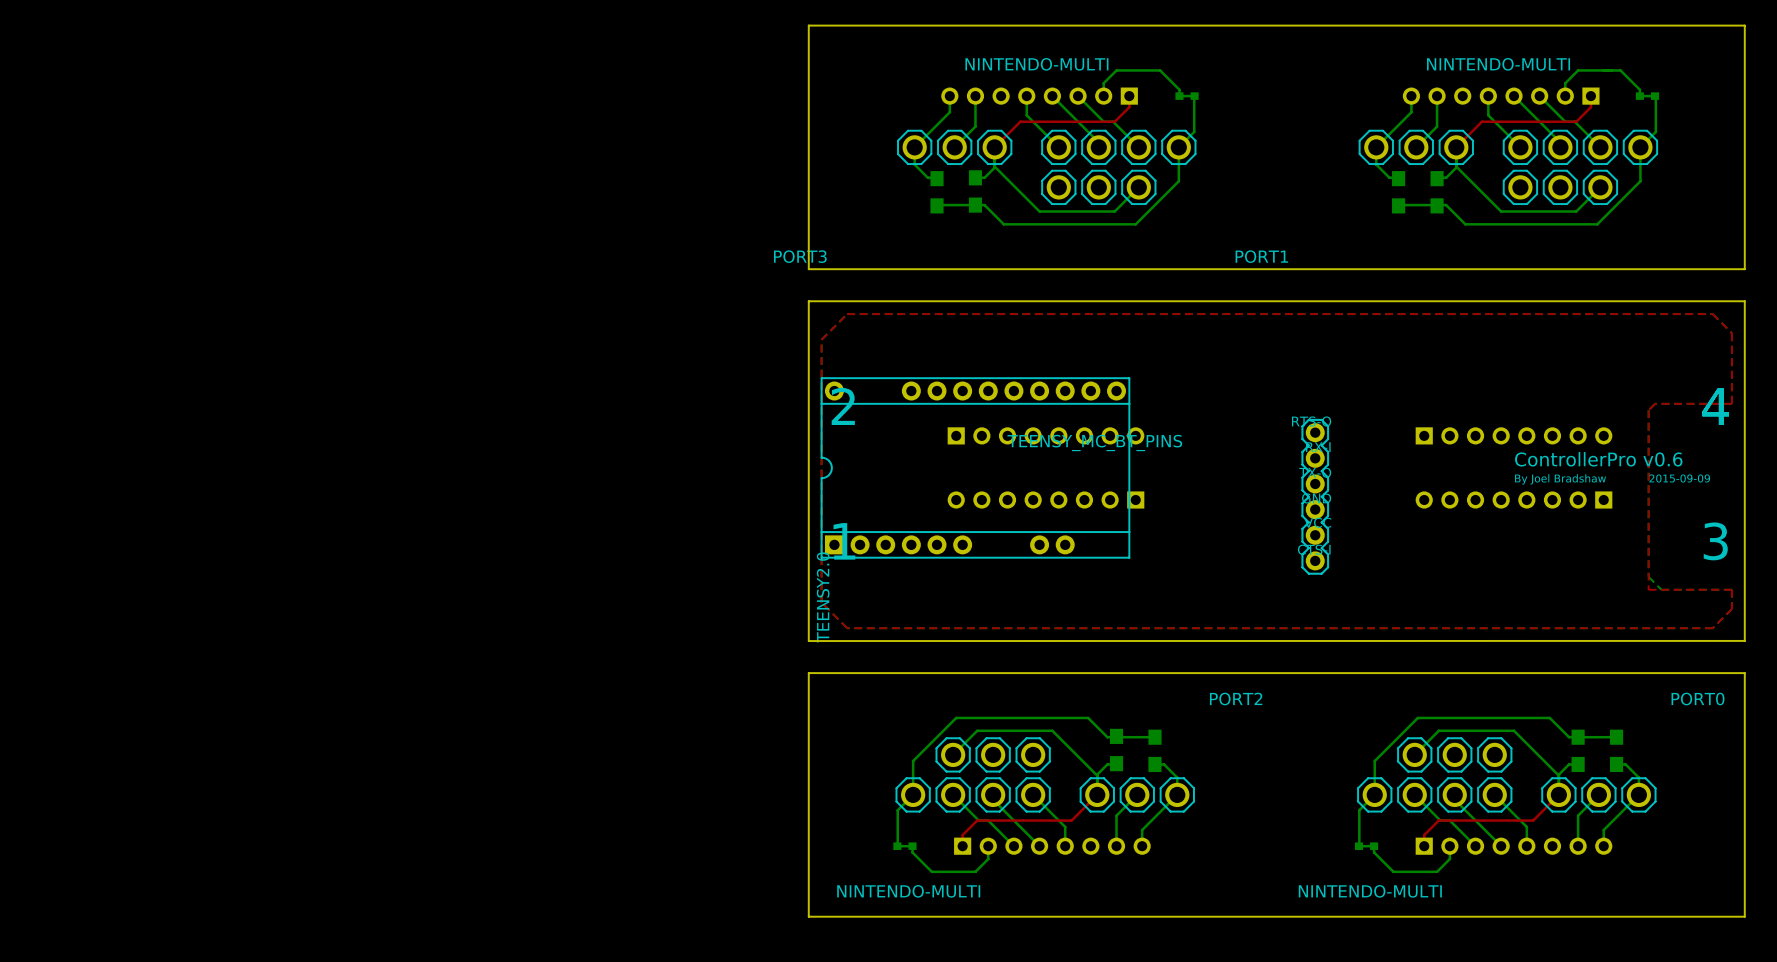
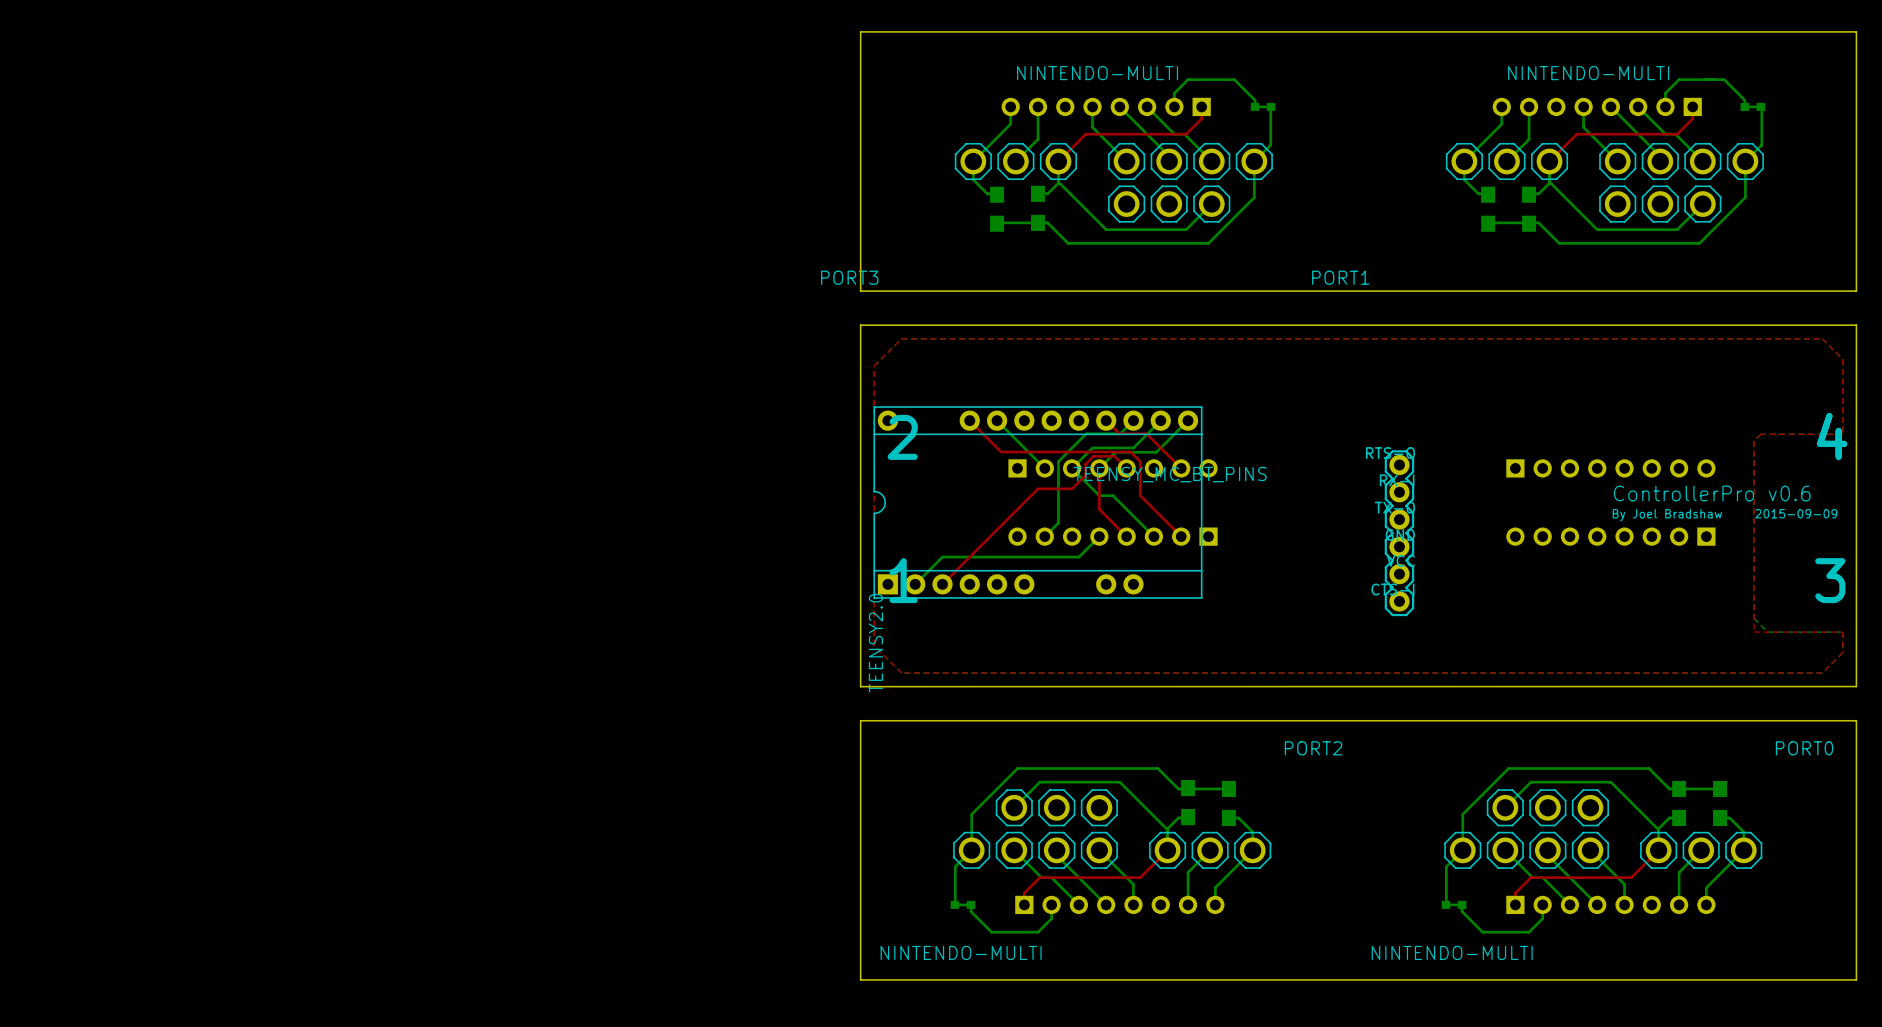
top track: none -> (969, 420) (1001, 451) (1130, 451) (1140, 461) (1140, 495) (1181, 536)
bottom track: none -> (997, 420) (1044, 468)
top track: none -> (1106, 420) (1119, 433) (1146, 433) (1181, 468)
bottom track: none -> (1133, 420) (1120, 433) (1086, 433) (1058, 461) (1058, 522) (1044, 536)
bottom track: none -> (1160, 420) (1133, 447) (1092, 447) (1072, 468) (1099, 495) (1113, 495) (1153, 536)
bottom track: none -> (1188, 420) (1156, 452) (1115, 452) (1099, 468)
top track: none -> (1099, 468) (1099, 509) (1126, 536)
top track: none -> (1126, 468) (1114, 456) (1093, 456) (1085, 464) (1085, 475) (1072, 488) (1037, 488) (942, 584)
bottom track: none -> (1099, 536) (1078, 557) (942, 557) (915, 584)

